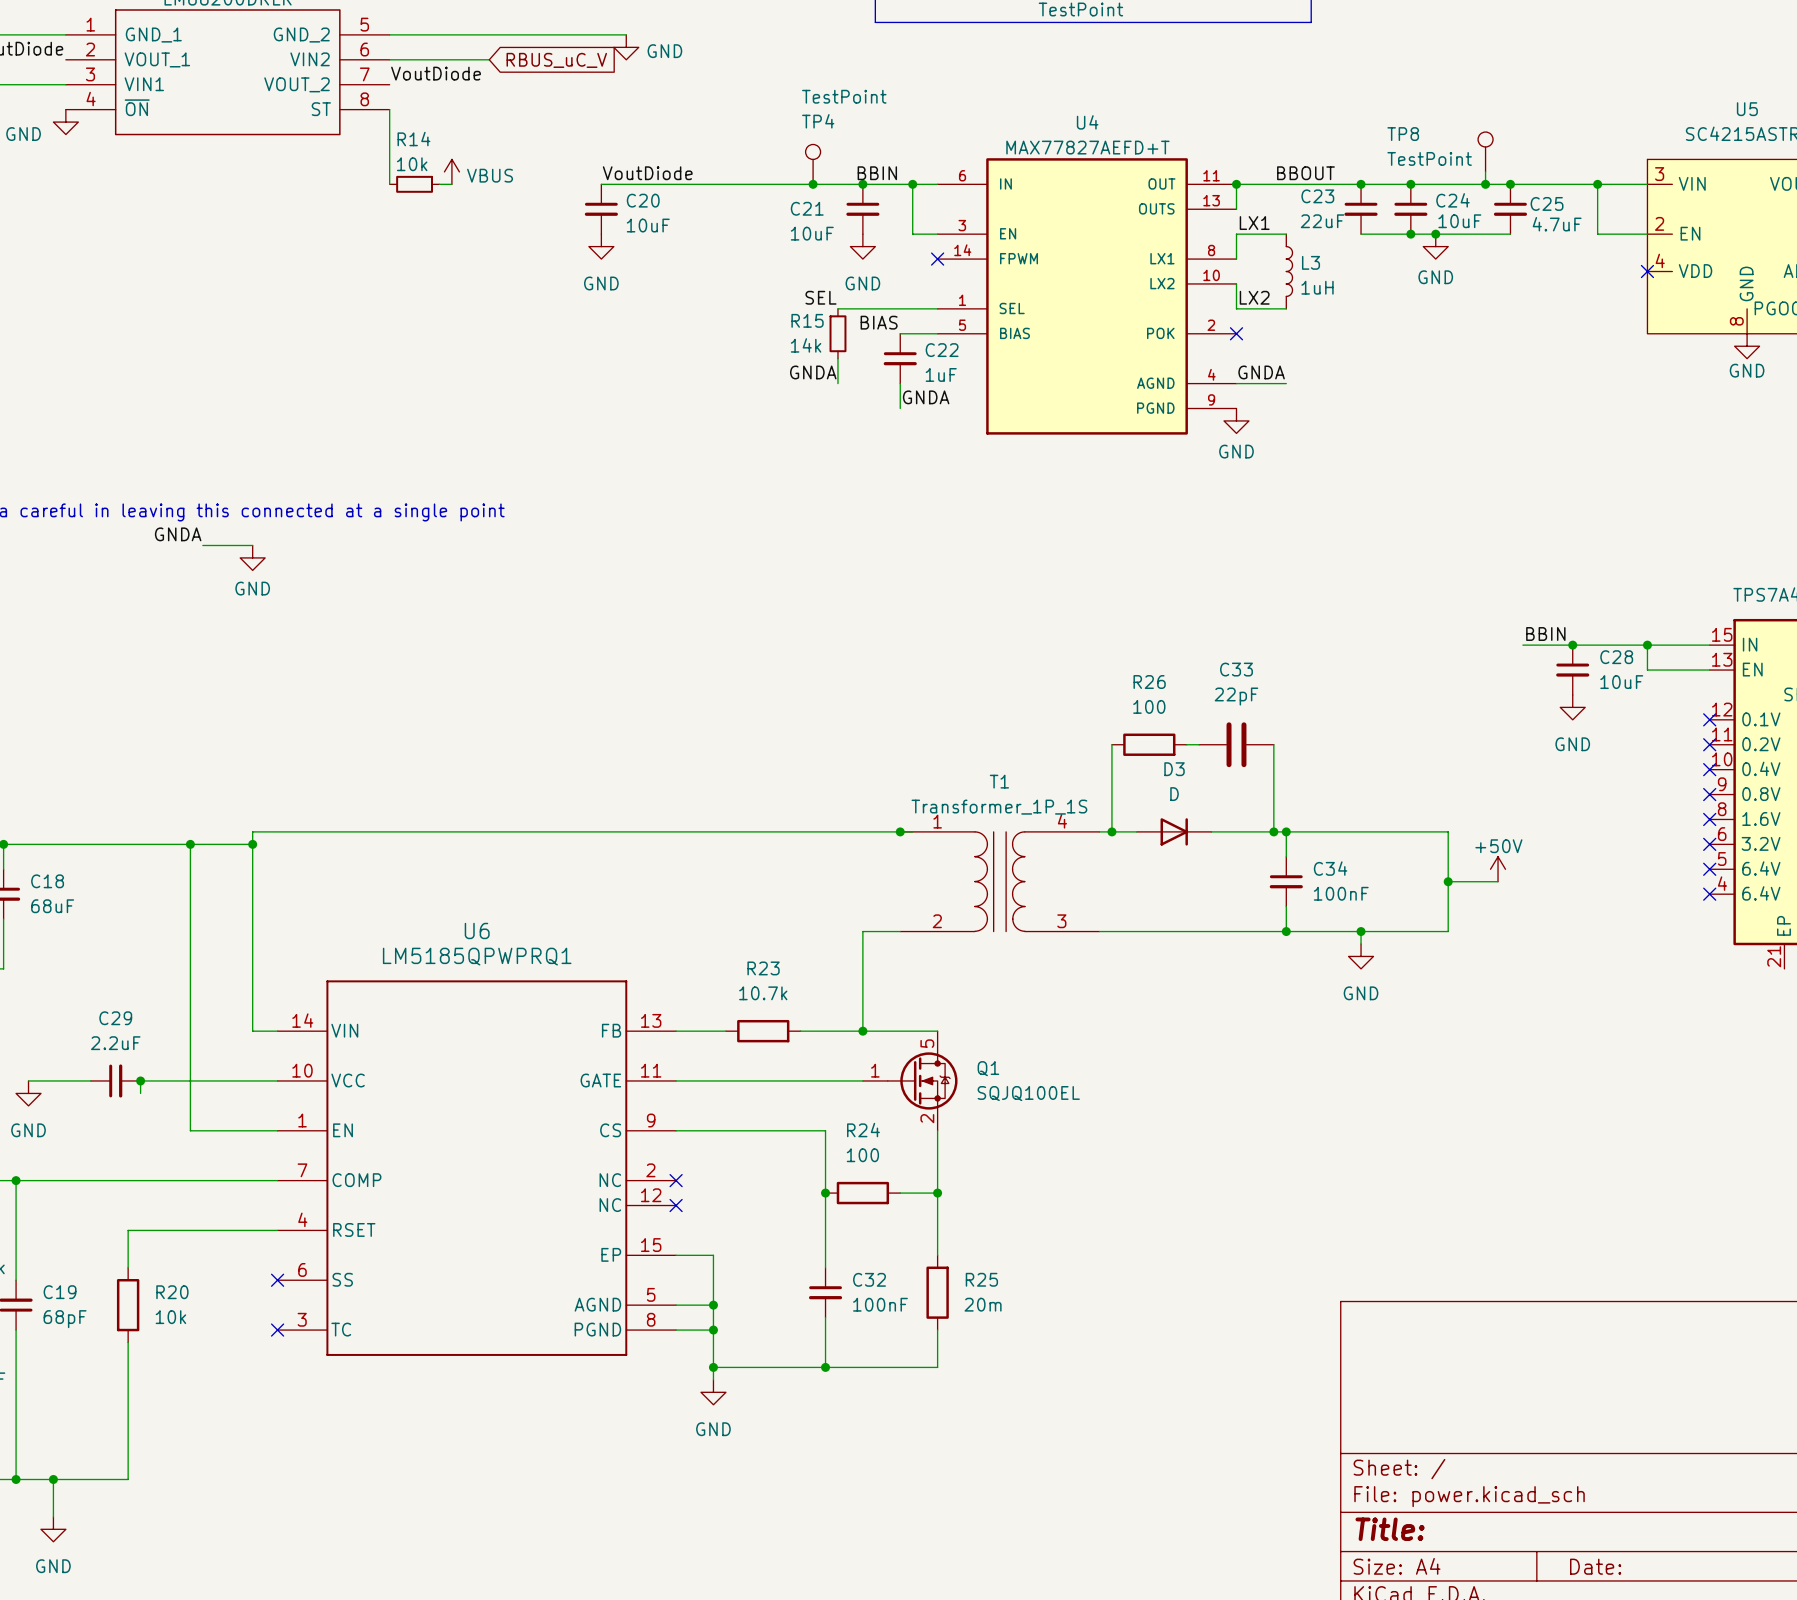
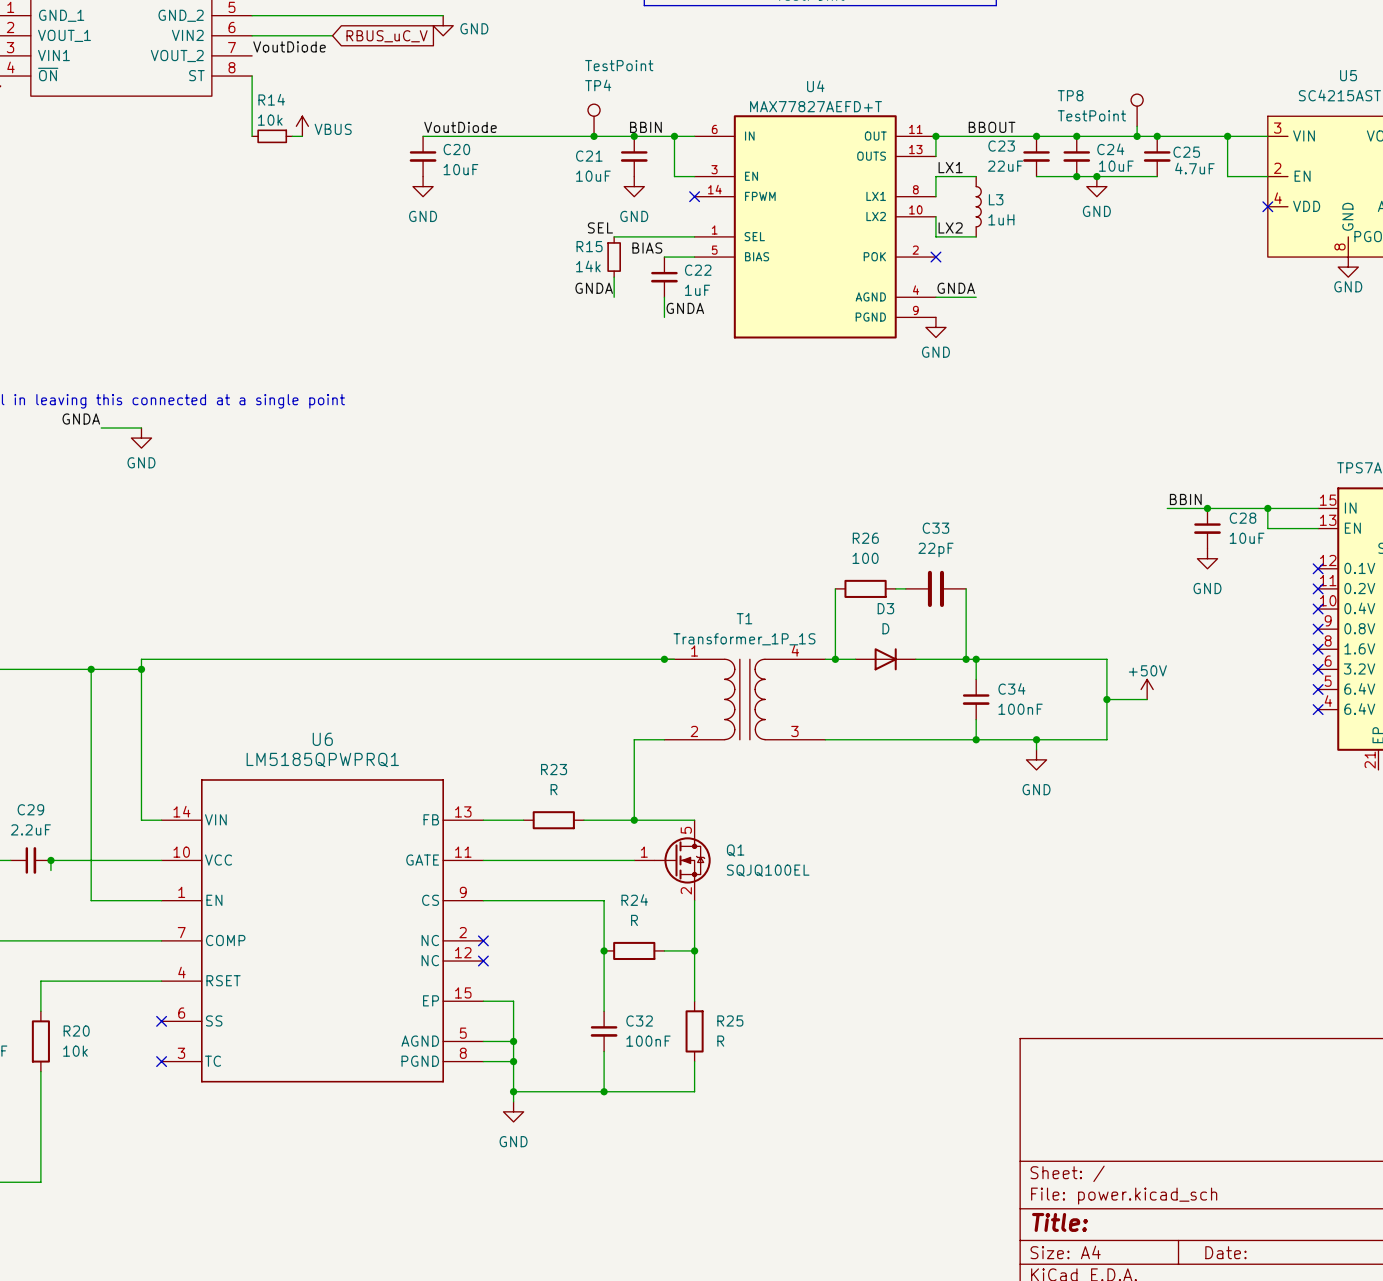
R23 value: 10.7k (763, 993) -> R (554, 789)
R24 value: 100 (862, 1155) -> R (634, 920)
R25 value: 20m (983, 1304) -> R (720, 1041)

